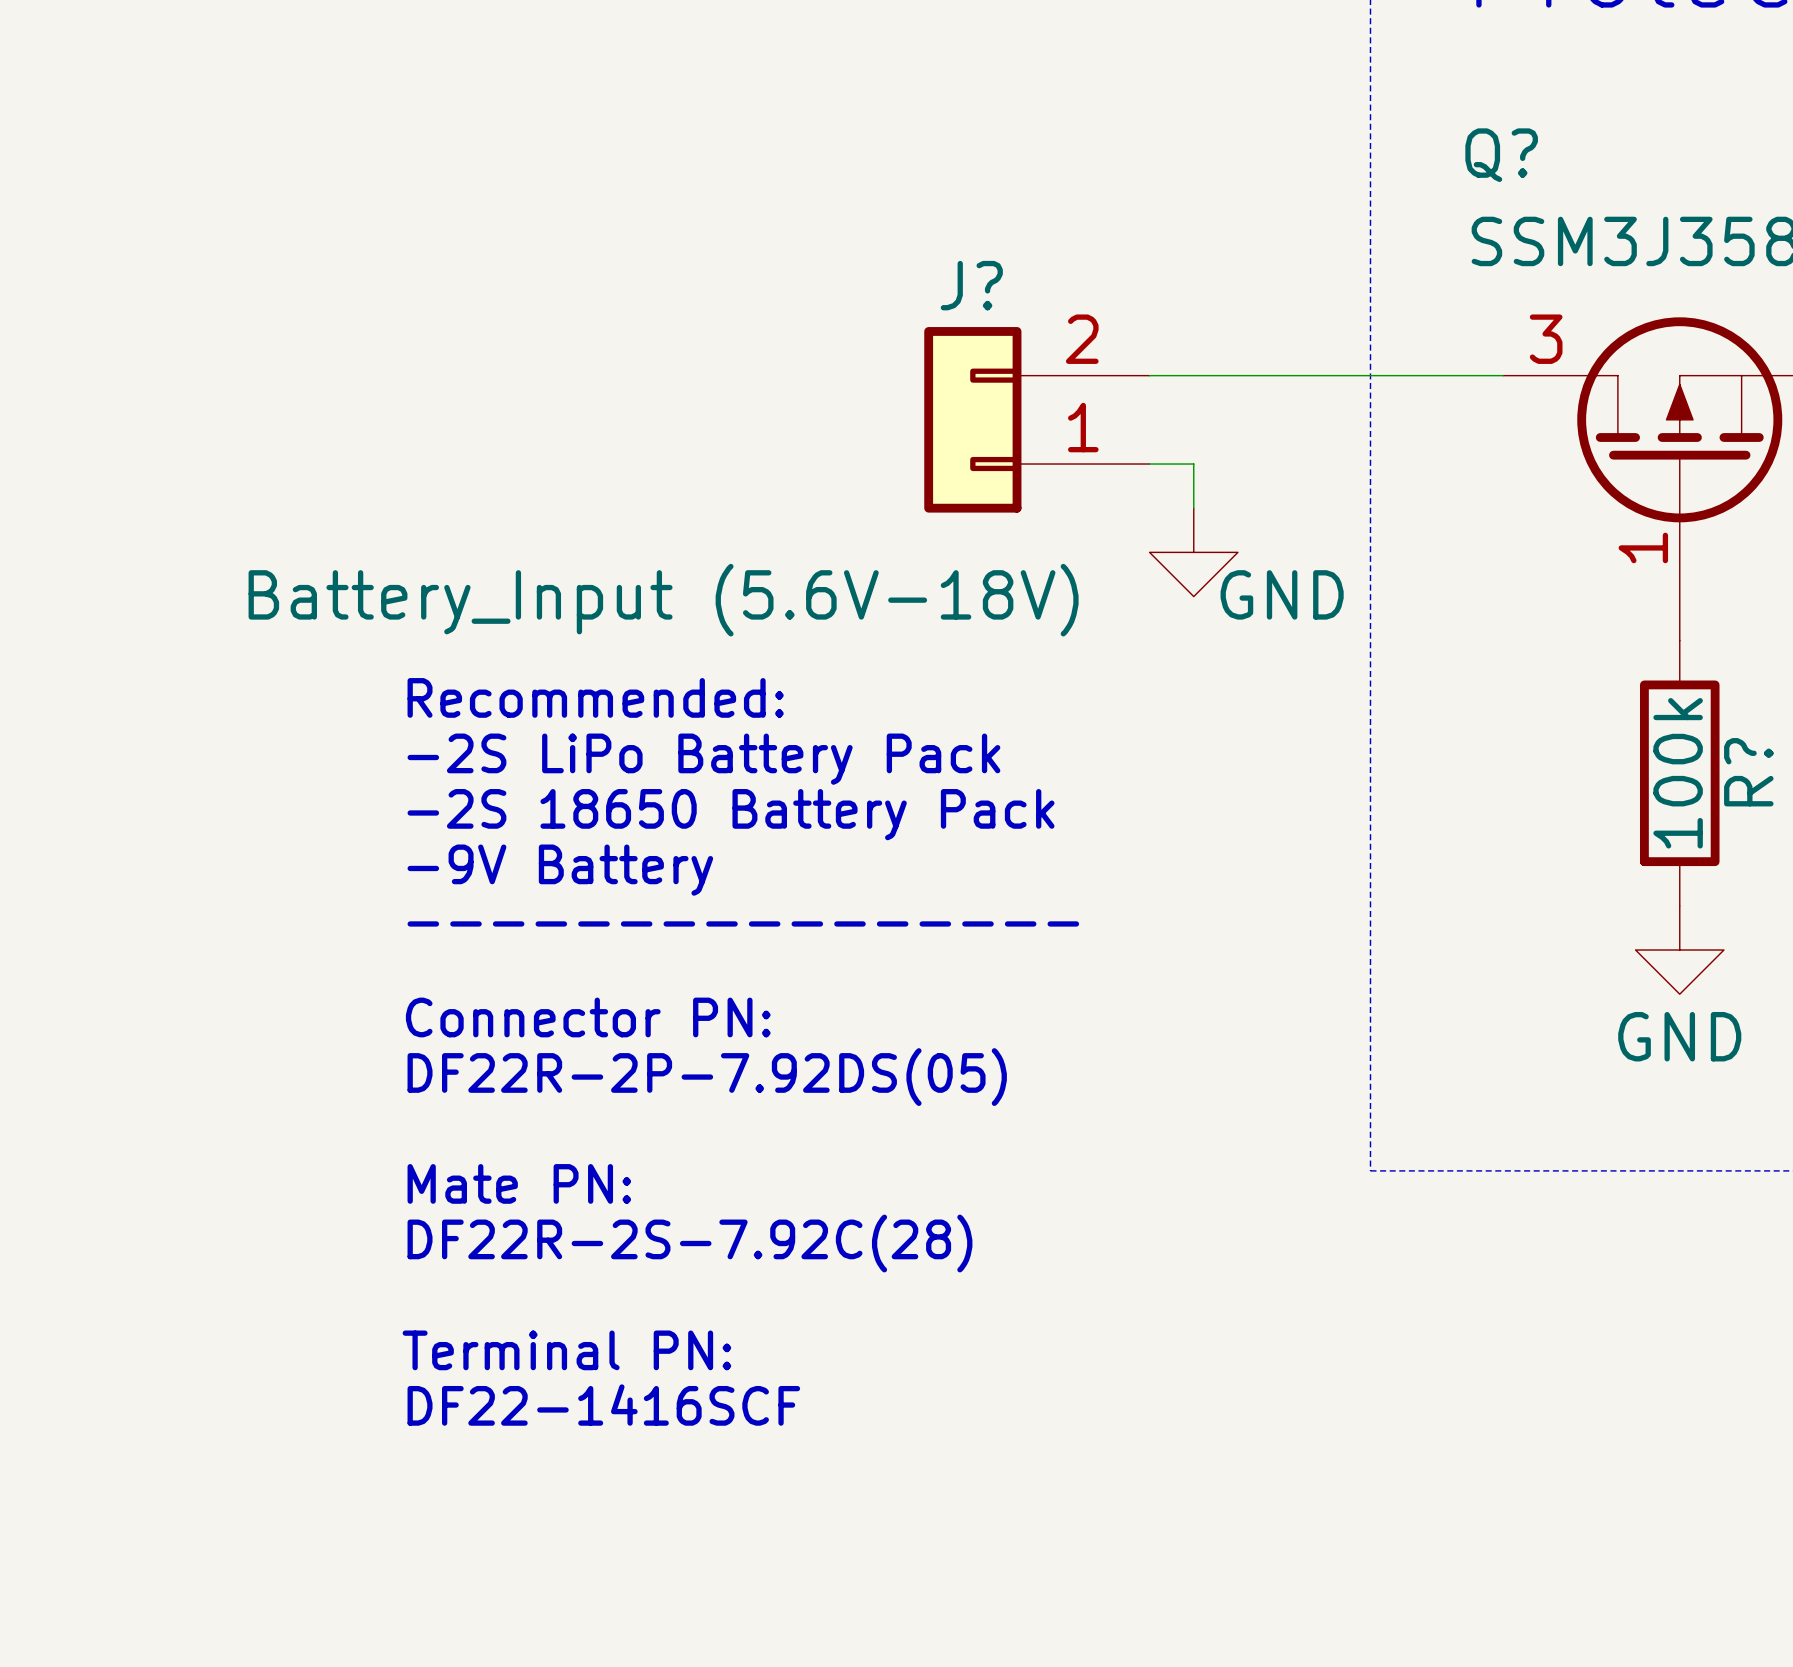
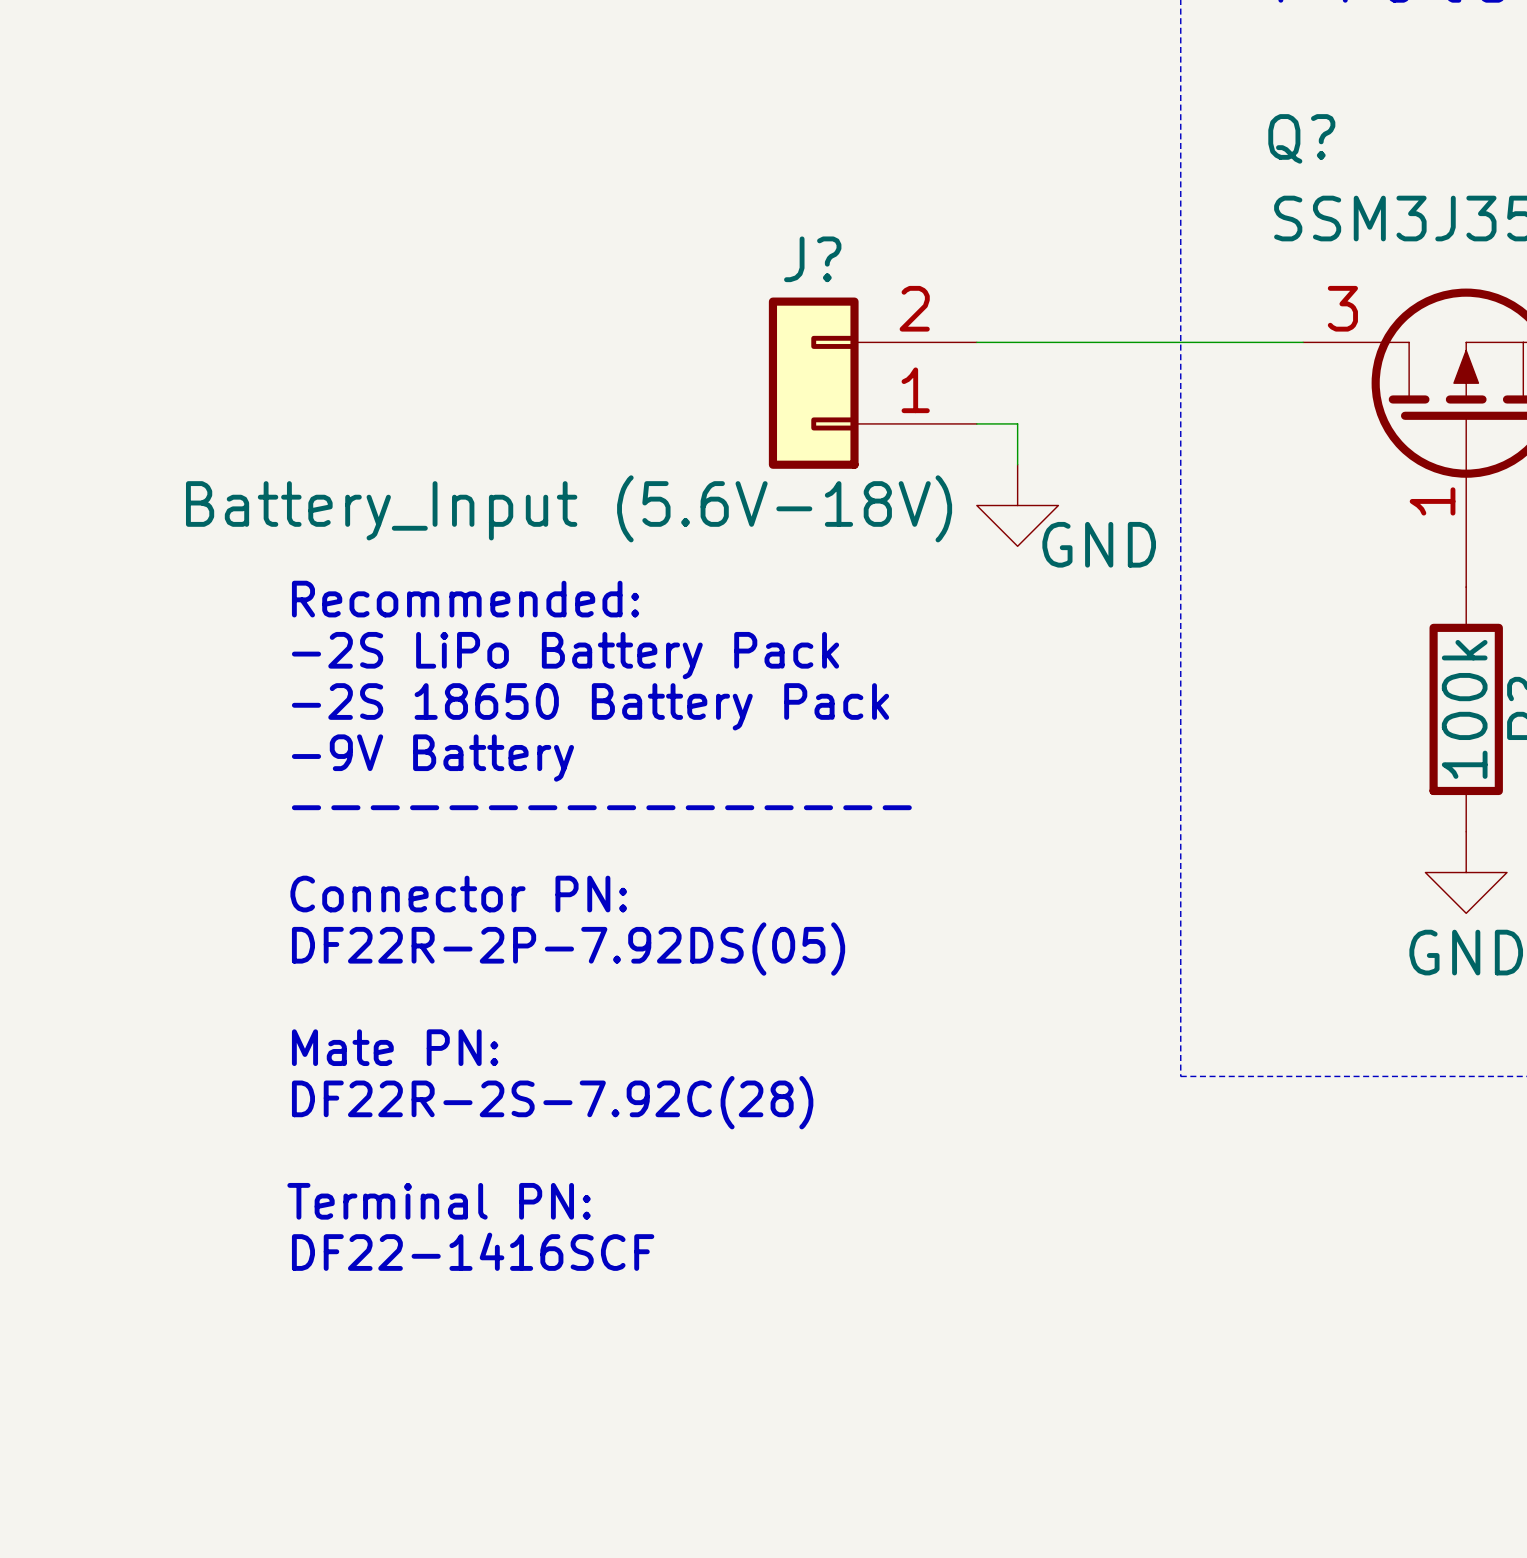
J? value position: Battery_Input (5.6V-18V) (663, 600) -> Battery_Input (5.6V-18V) (569, 508)
text position: Recommended: (595, 697) -> Recommended: (465, 599)
text position: -2S LiPo Battery Pack (703, 759) -> -2S LiPo Battery Pack (565, 655)
text position: -2S 18650 Battery Pack (731, 814) -> -2S 18650 Battery Pack (590, 706)
text position: -9V Battery (560, 870) -> -9V Battery (432, 758)
text position: ---------------- (743, 923) -> ---------------- (601, 807)
text position: Connector PN: (588, 1017) -> Connector PN: (458, 894)
text position: DF22R-2P-7.92DS(05) (707, 1077) -> DF22R-2P-7.92DS(05) (568, 949)
text position: Mate PN: (519, 1183) -> Mate PN: (395, 1047)
text position: DF22R-2S-7.92C(28) (689, 1243) -> DF22R-2S-7.92C(28) (552, 1102)
text position: Terminal PN: (566, 1350) -> Terminal PN: (439, 1201)
text position: DF22-1416SCF (603, 1405) -> DF22-1416SCF (473, 1251)

